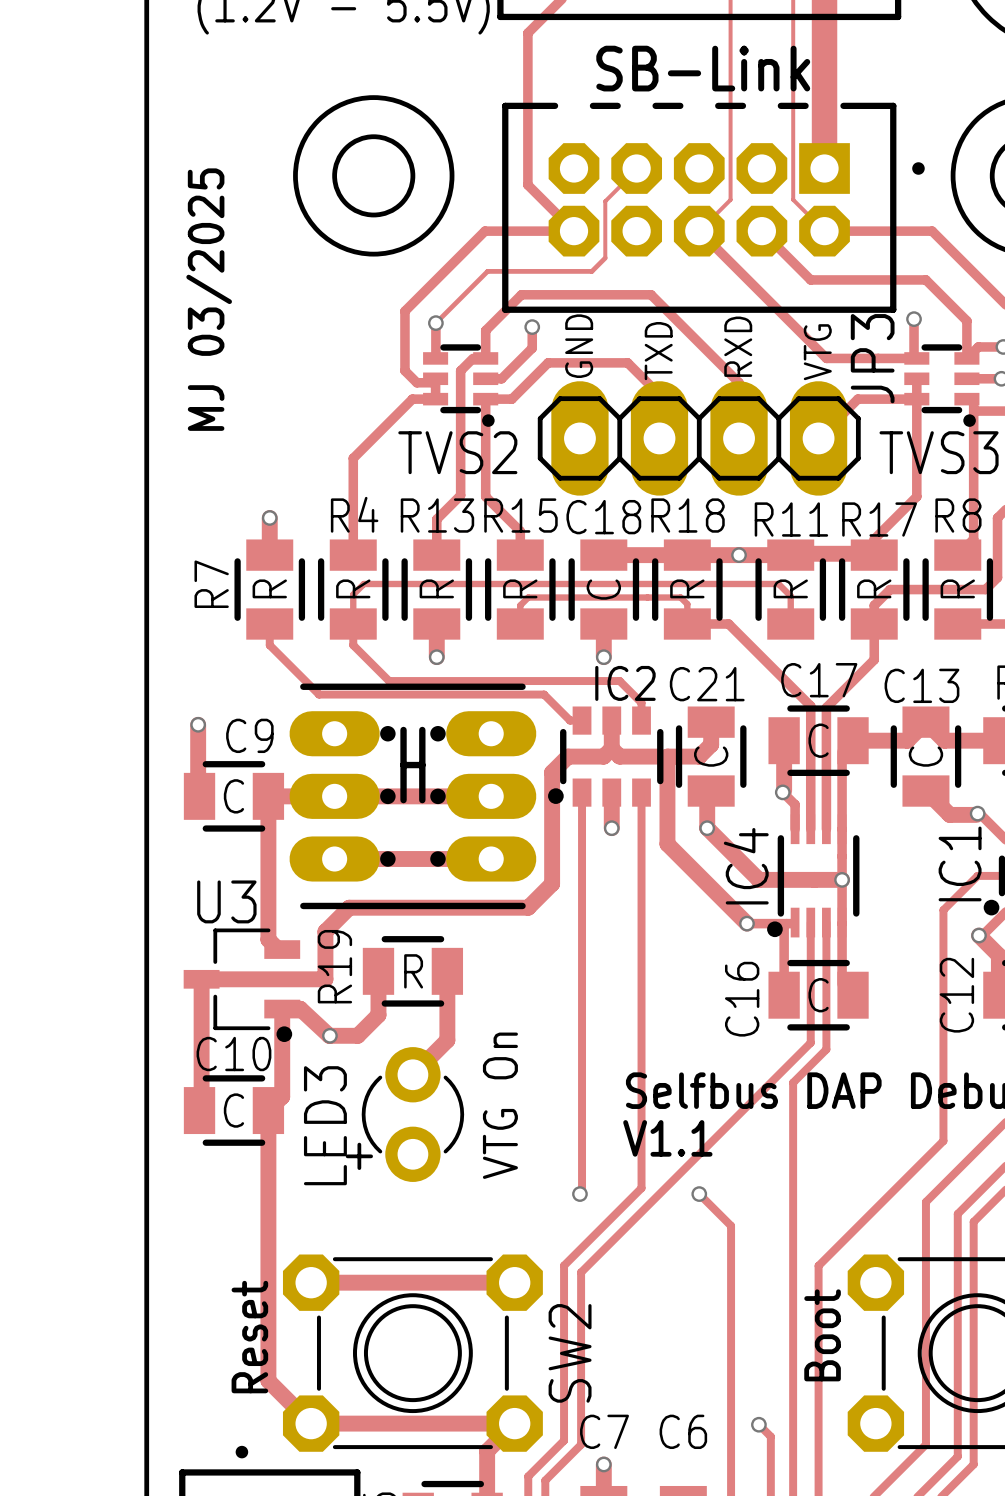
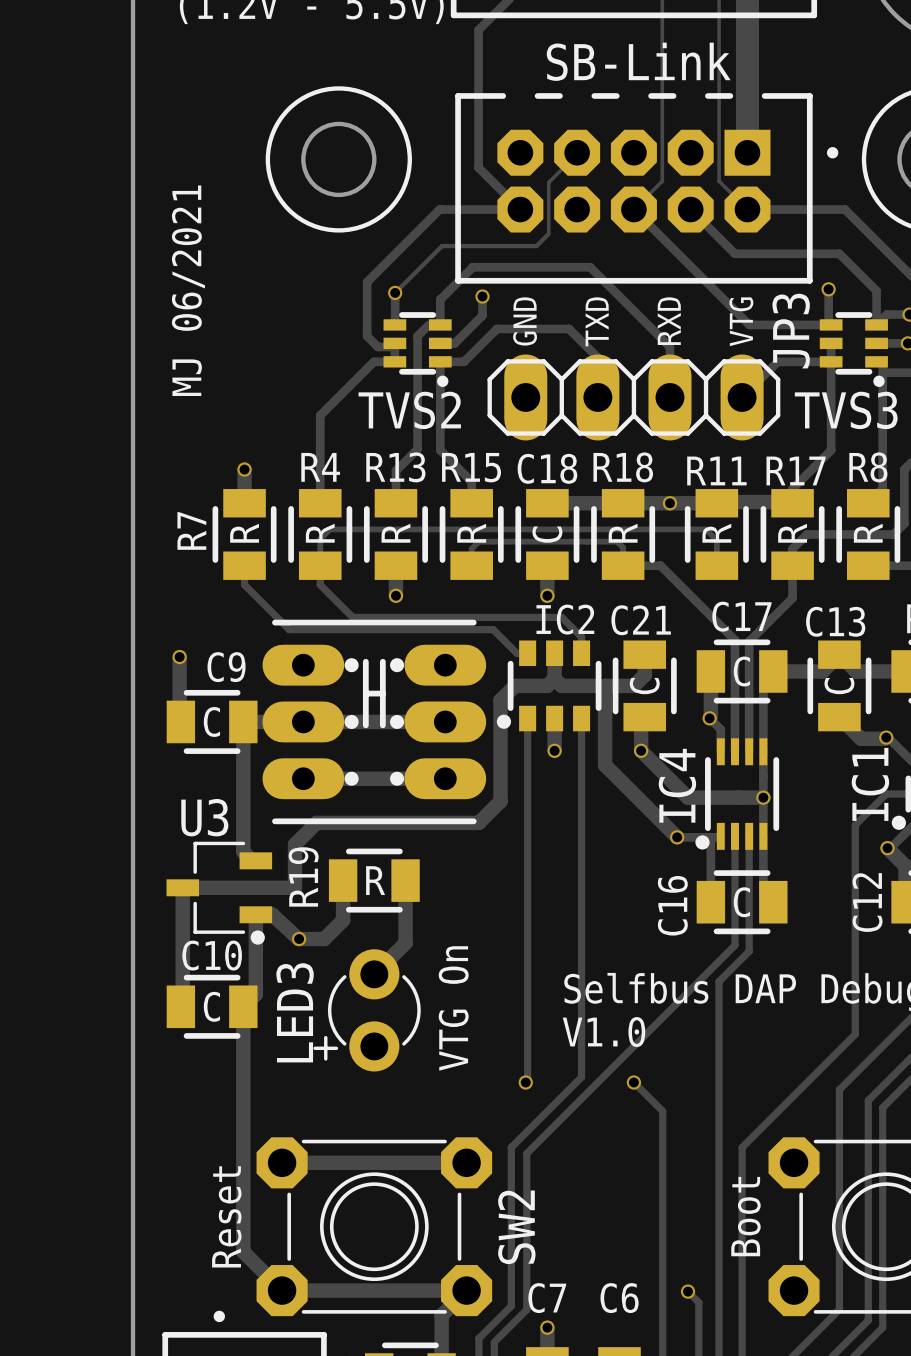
text: MJ 03/2025 (209, 299) -> MJ 06/2021 (188, 290)
JP3 footprint: [537, 381, 861, 496] -> [487, 354, 781, 441]
text: V1.1 (667, 1138) -> V1.0 (604, 1032)

